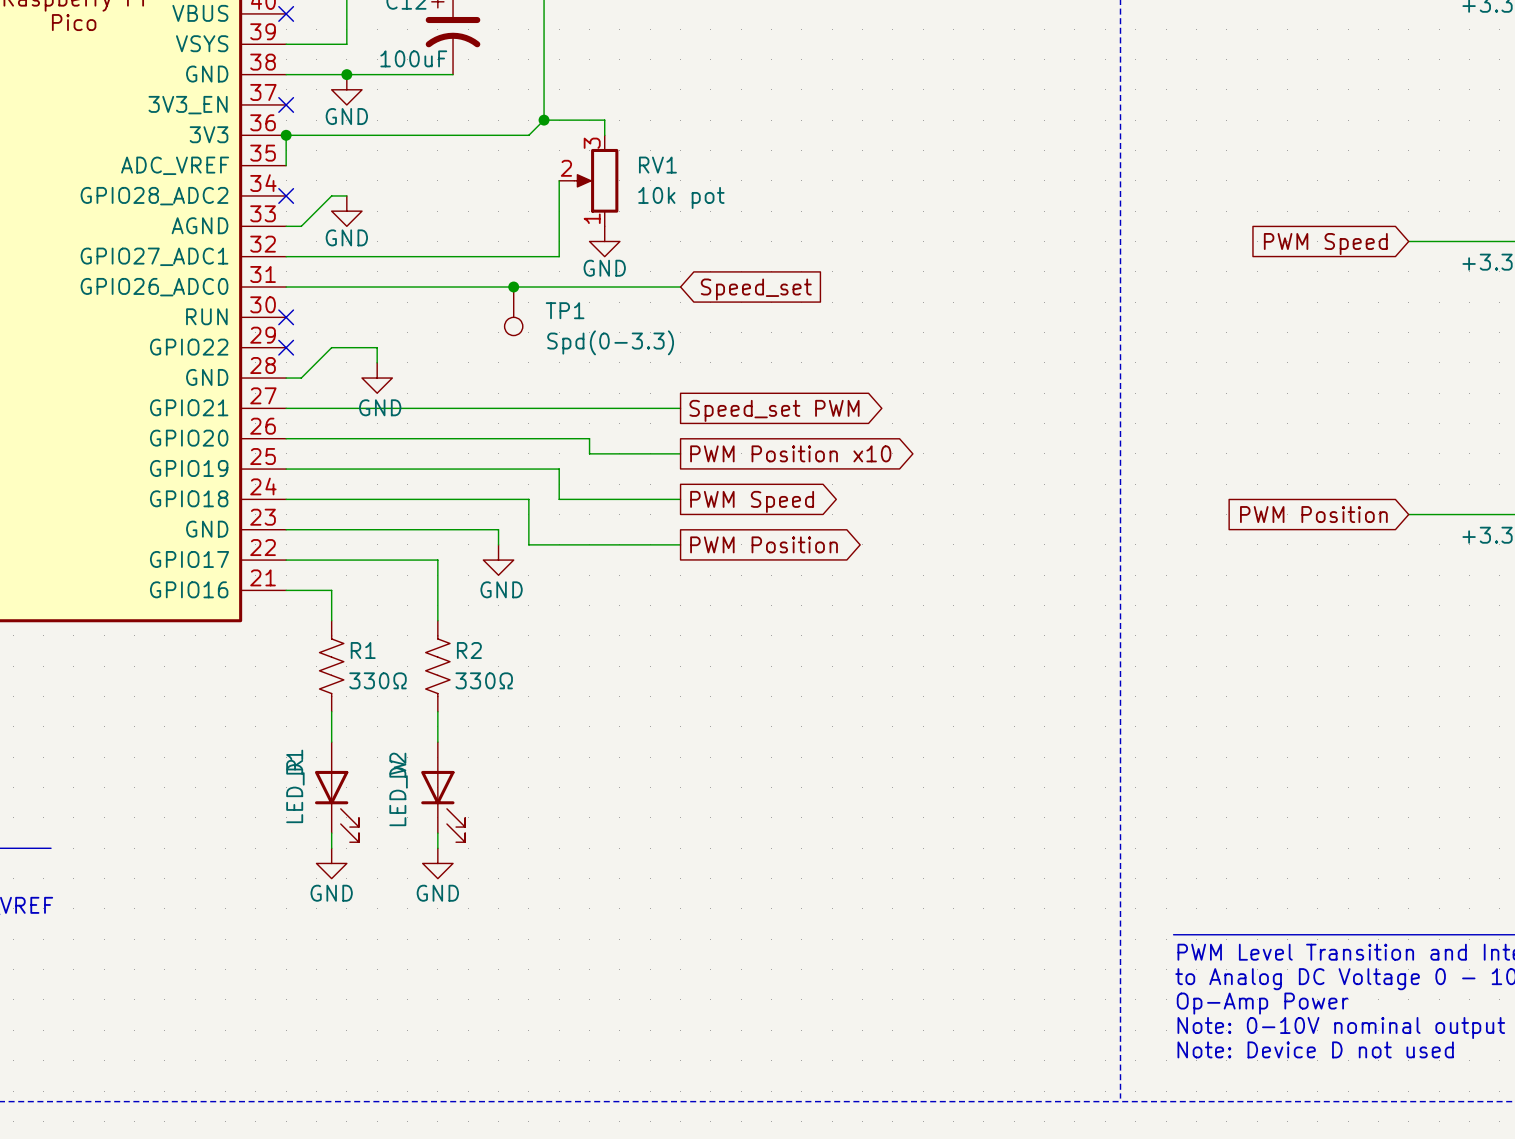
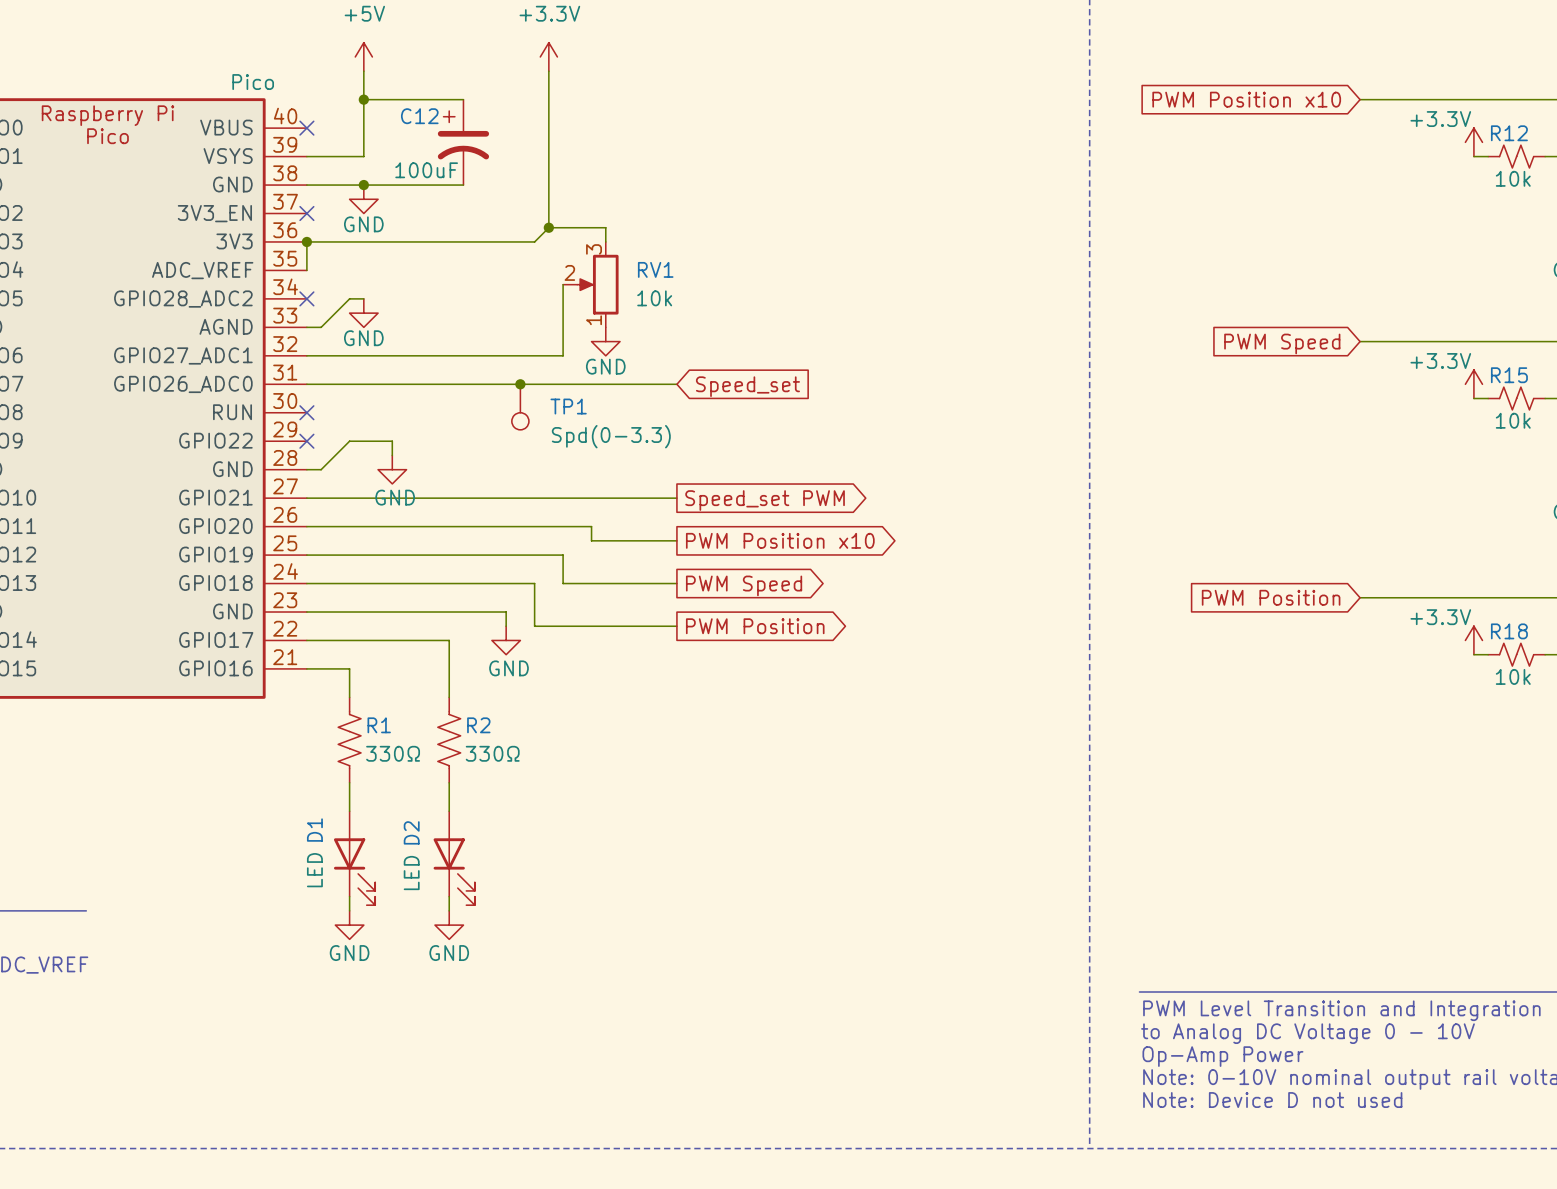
RV1 value: 10k pot (681, 197) -> 10k (654, 298)
D1 value: LED_R (295, 791) -> LED (314, 870)
D2 value: LED_W (398, 793) -> LED (411, 873)

